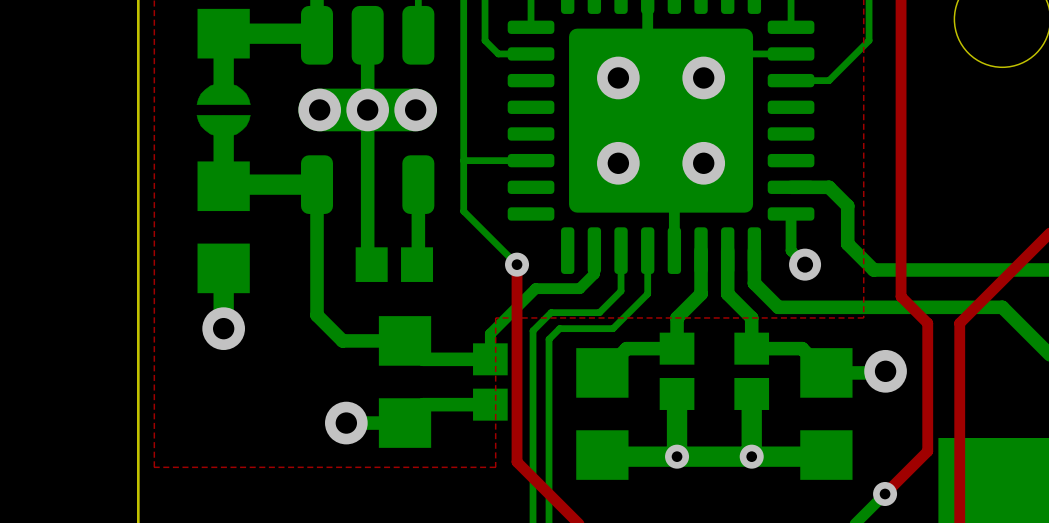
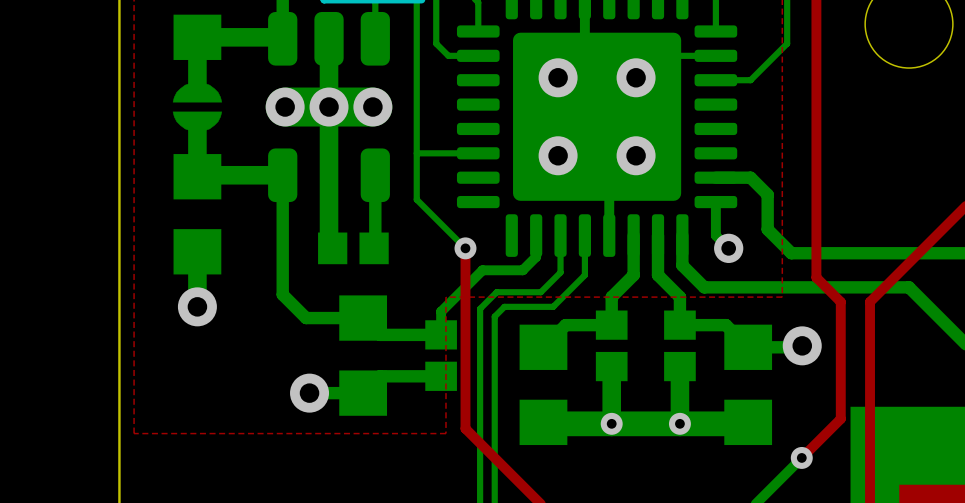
bottom track width: thin (367, 24) (367, 255) -> thick (329, 29) (329, 239)
bottom track width: thin (603, 456) (824, 456) -> thick (544, 423) (746, 423)

